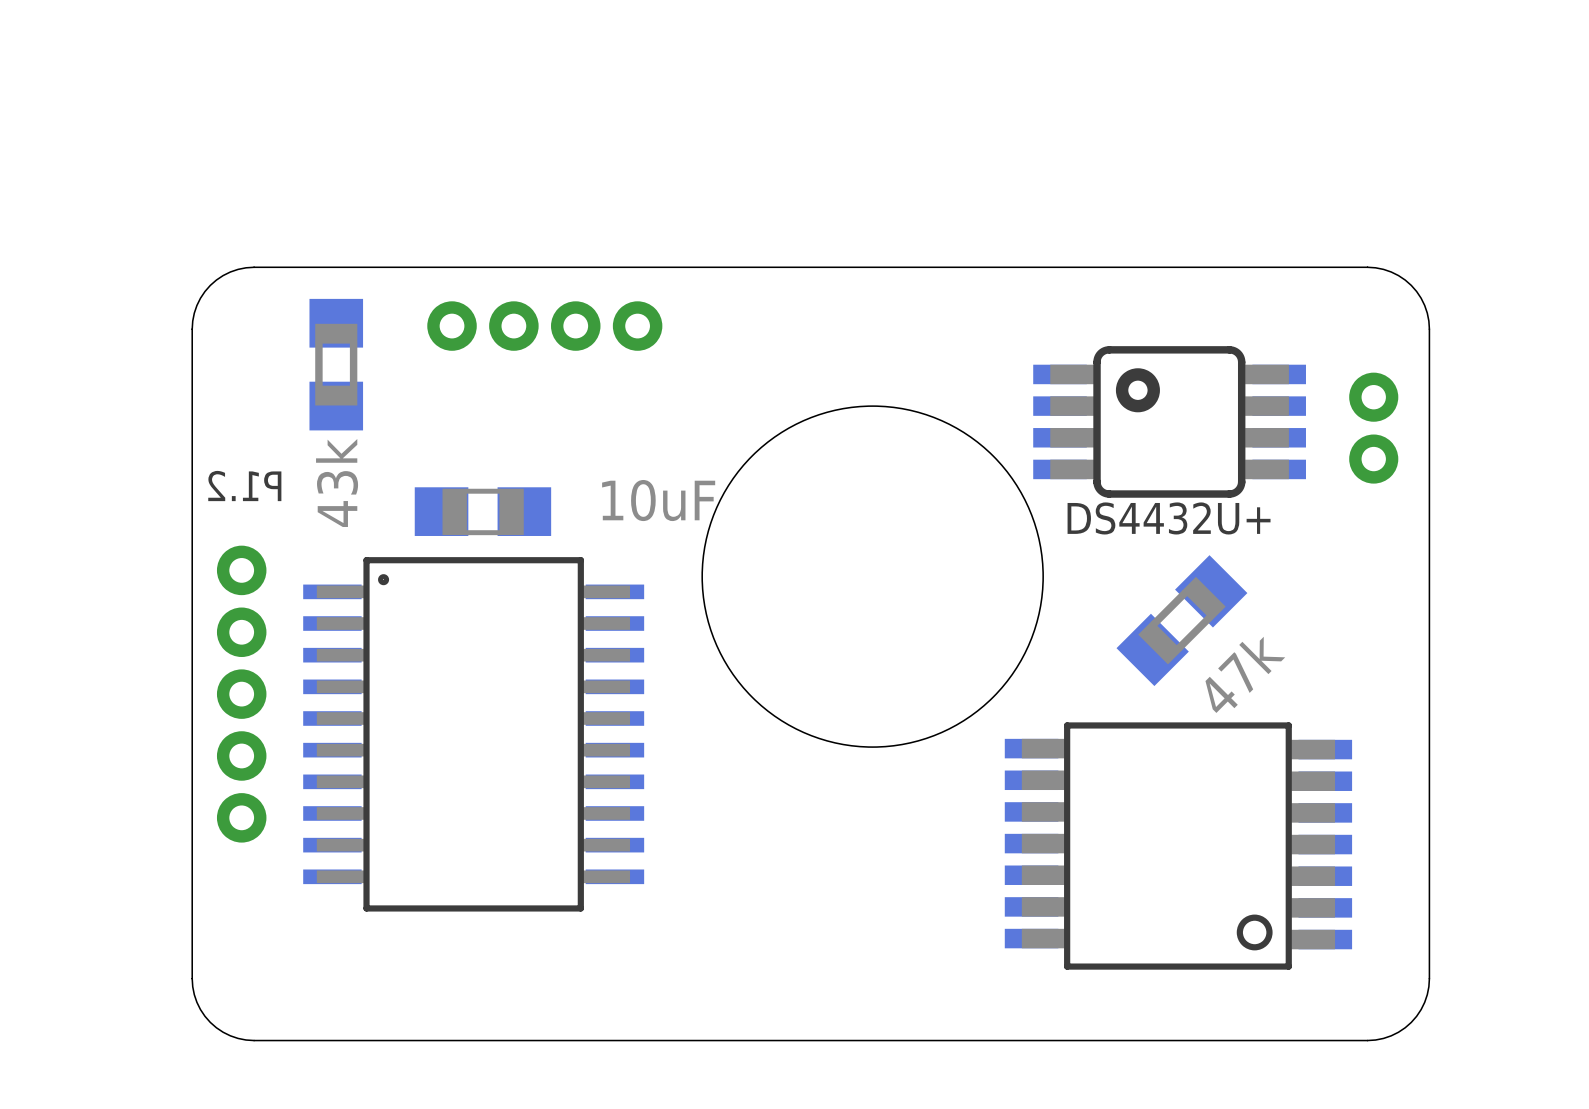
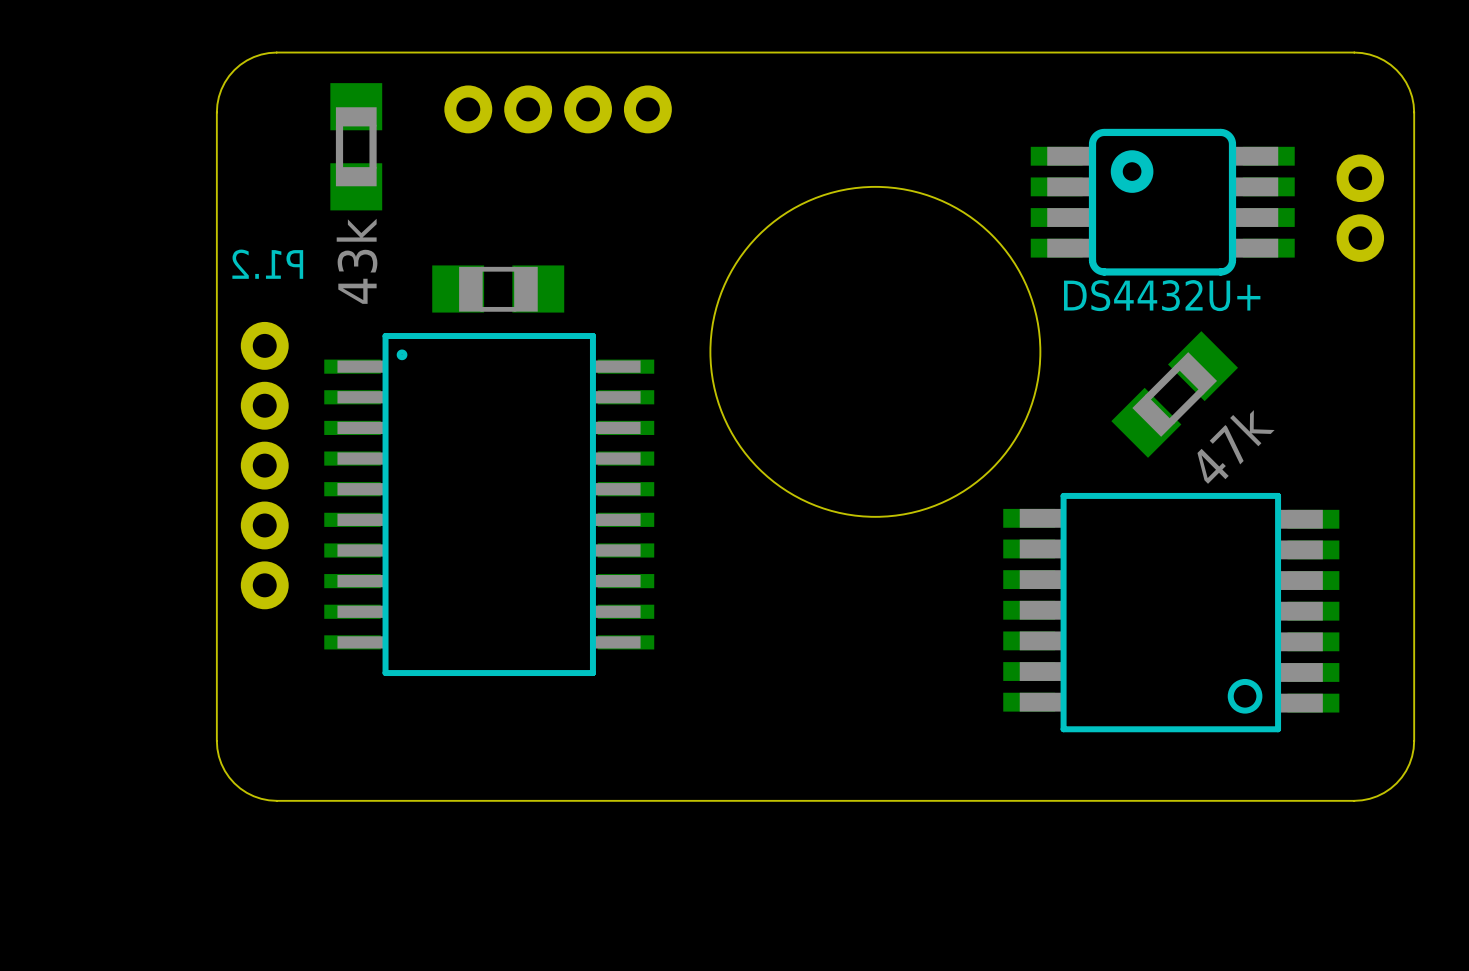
part value: 10uF (658, 500) -> none

